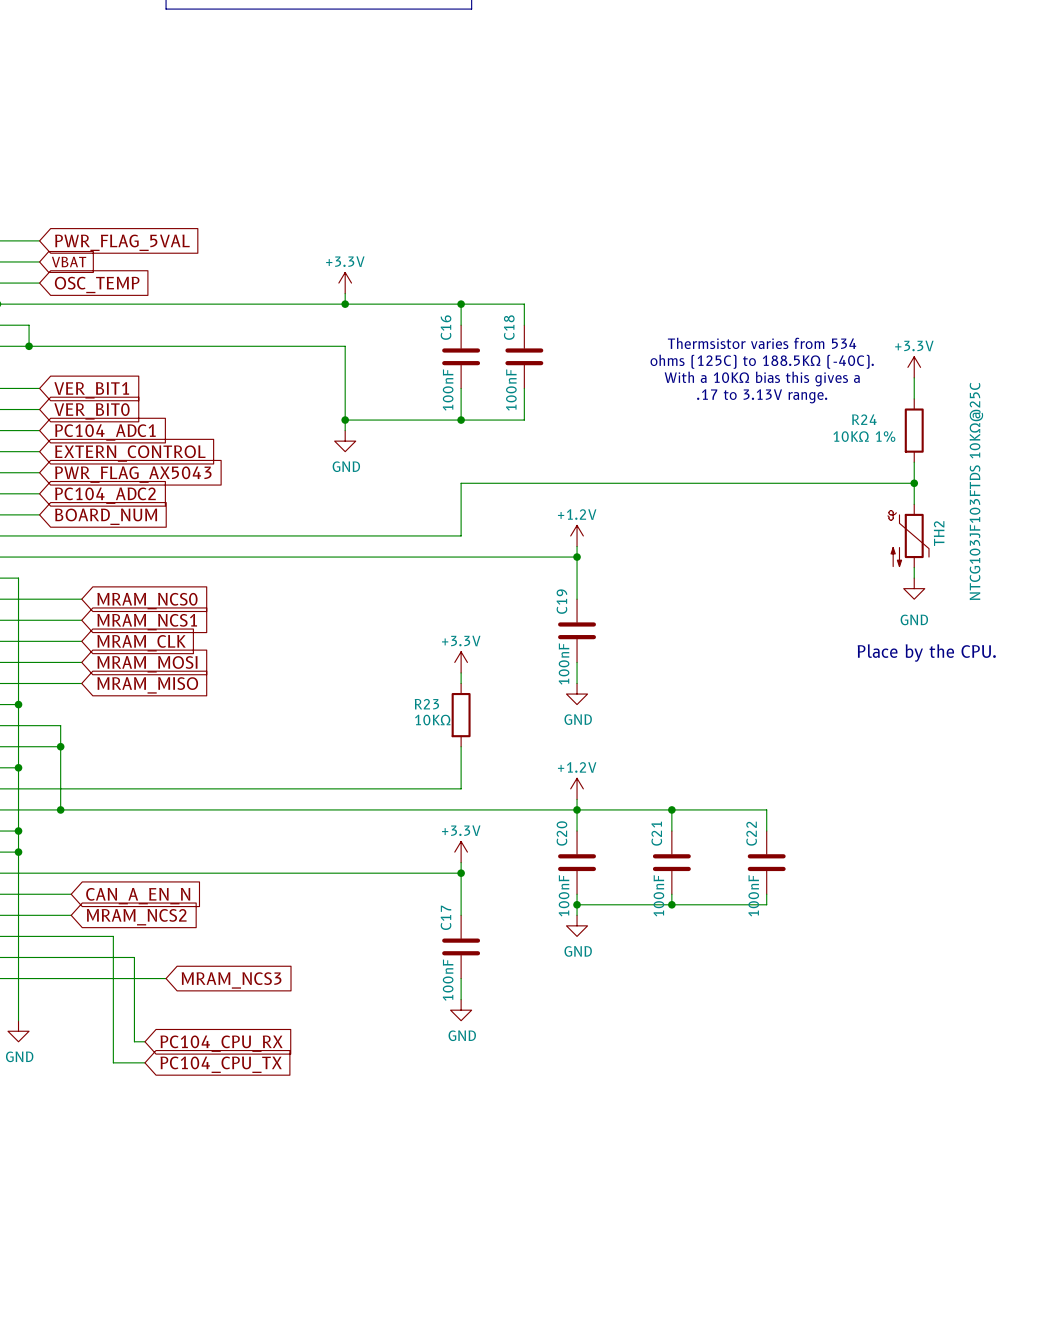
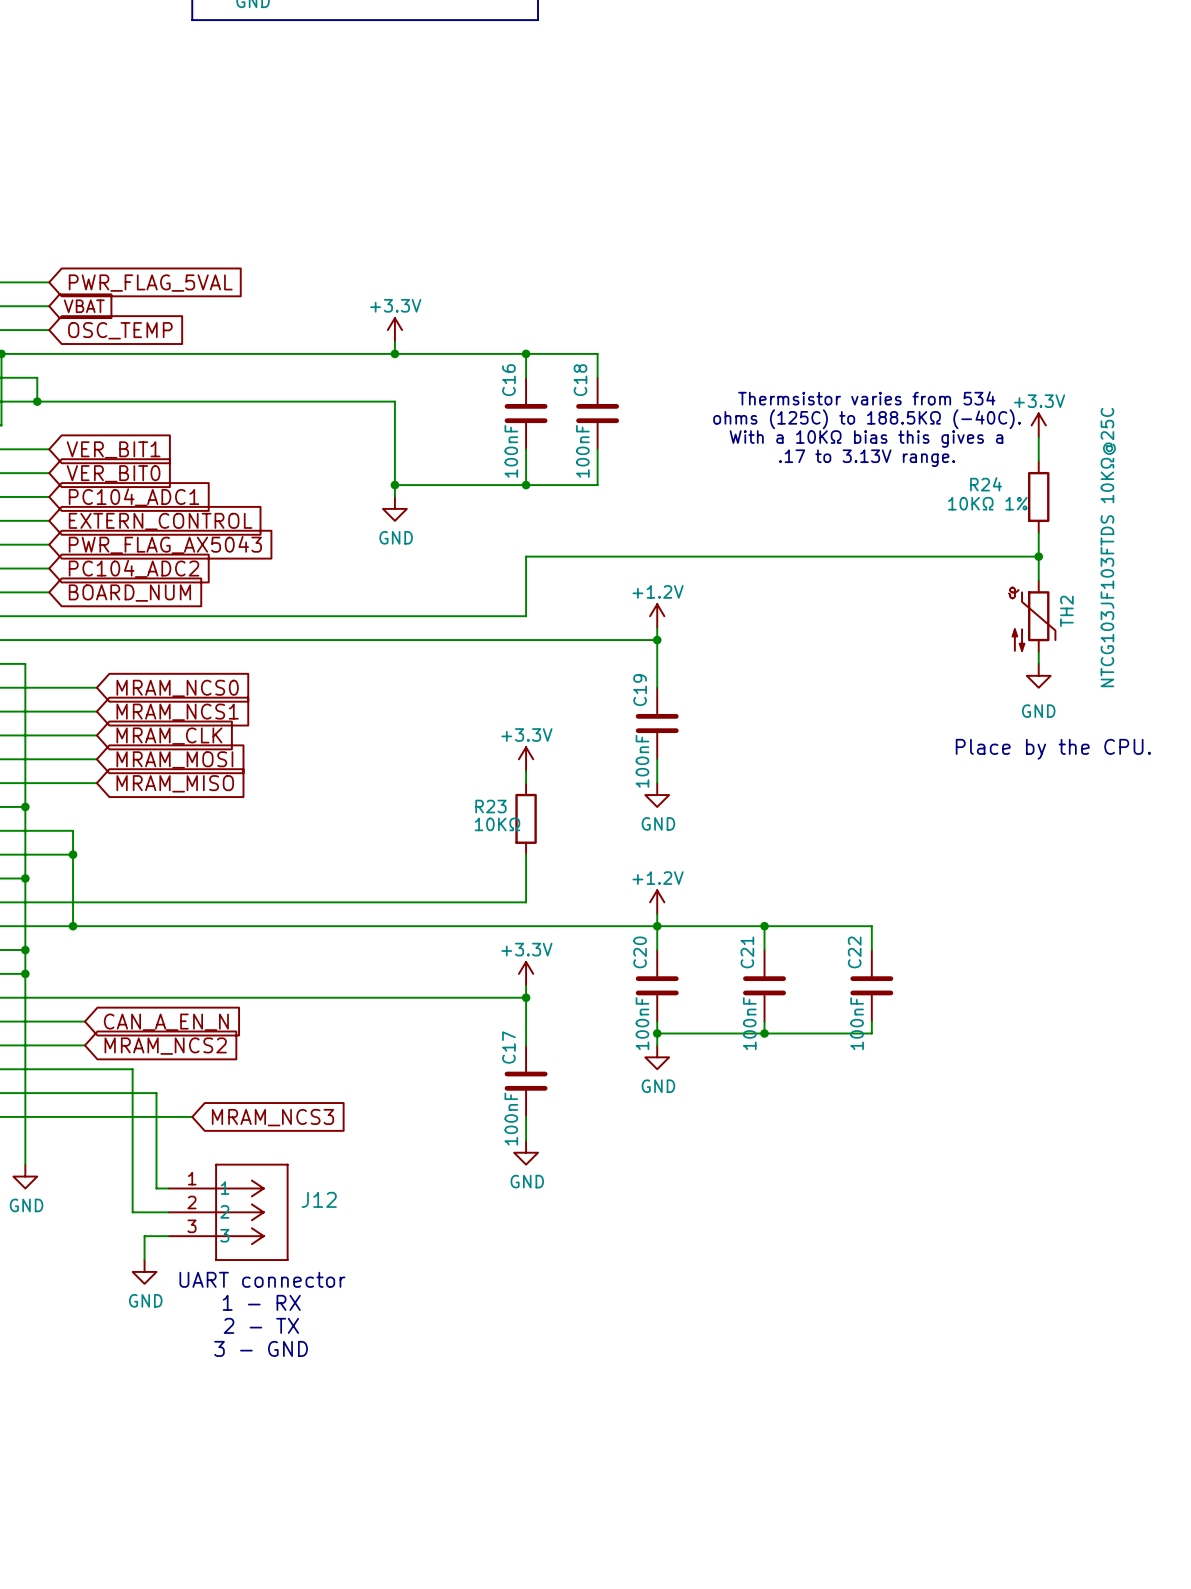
global label: PC104_CPU_RX (221, 1043) -> none
J12: none -> (228, 1212)
global label: PC104_CPU_TX (221, 1064) -> none
wire: none -> (168, 1236) (144, 1236) (144, 1260)
power symbol: none -> GND (144, 1271)
text: none -> UART connector (262, 1279)
text: none -> 1 - RX (261, 1302)
text: none -> 2 - TX (261, 1325)
text: none -> 3 - GND (261, 1348)

